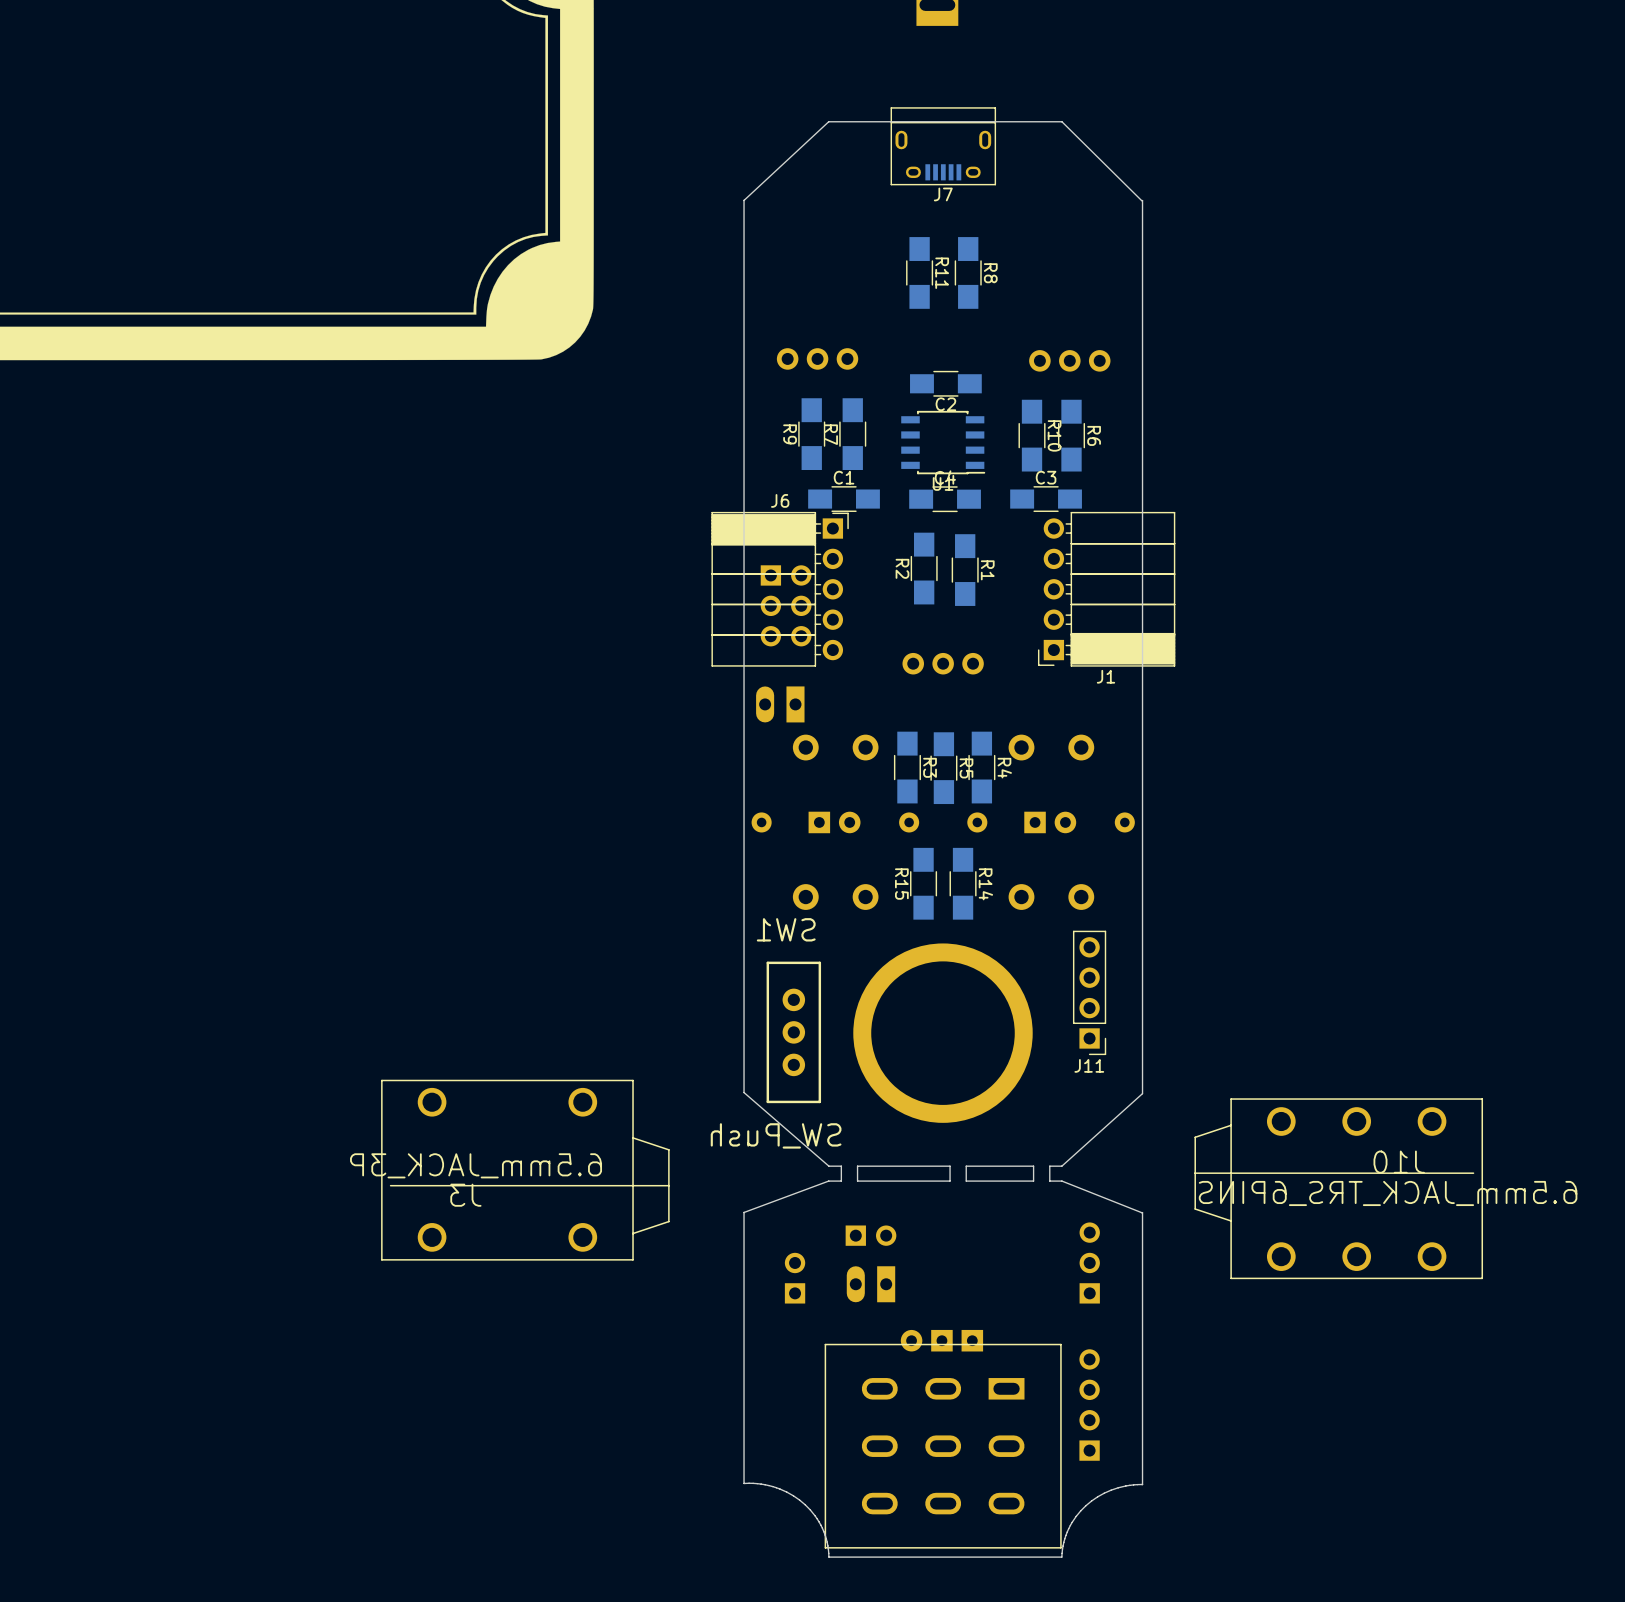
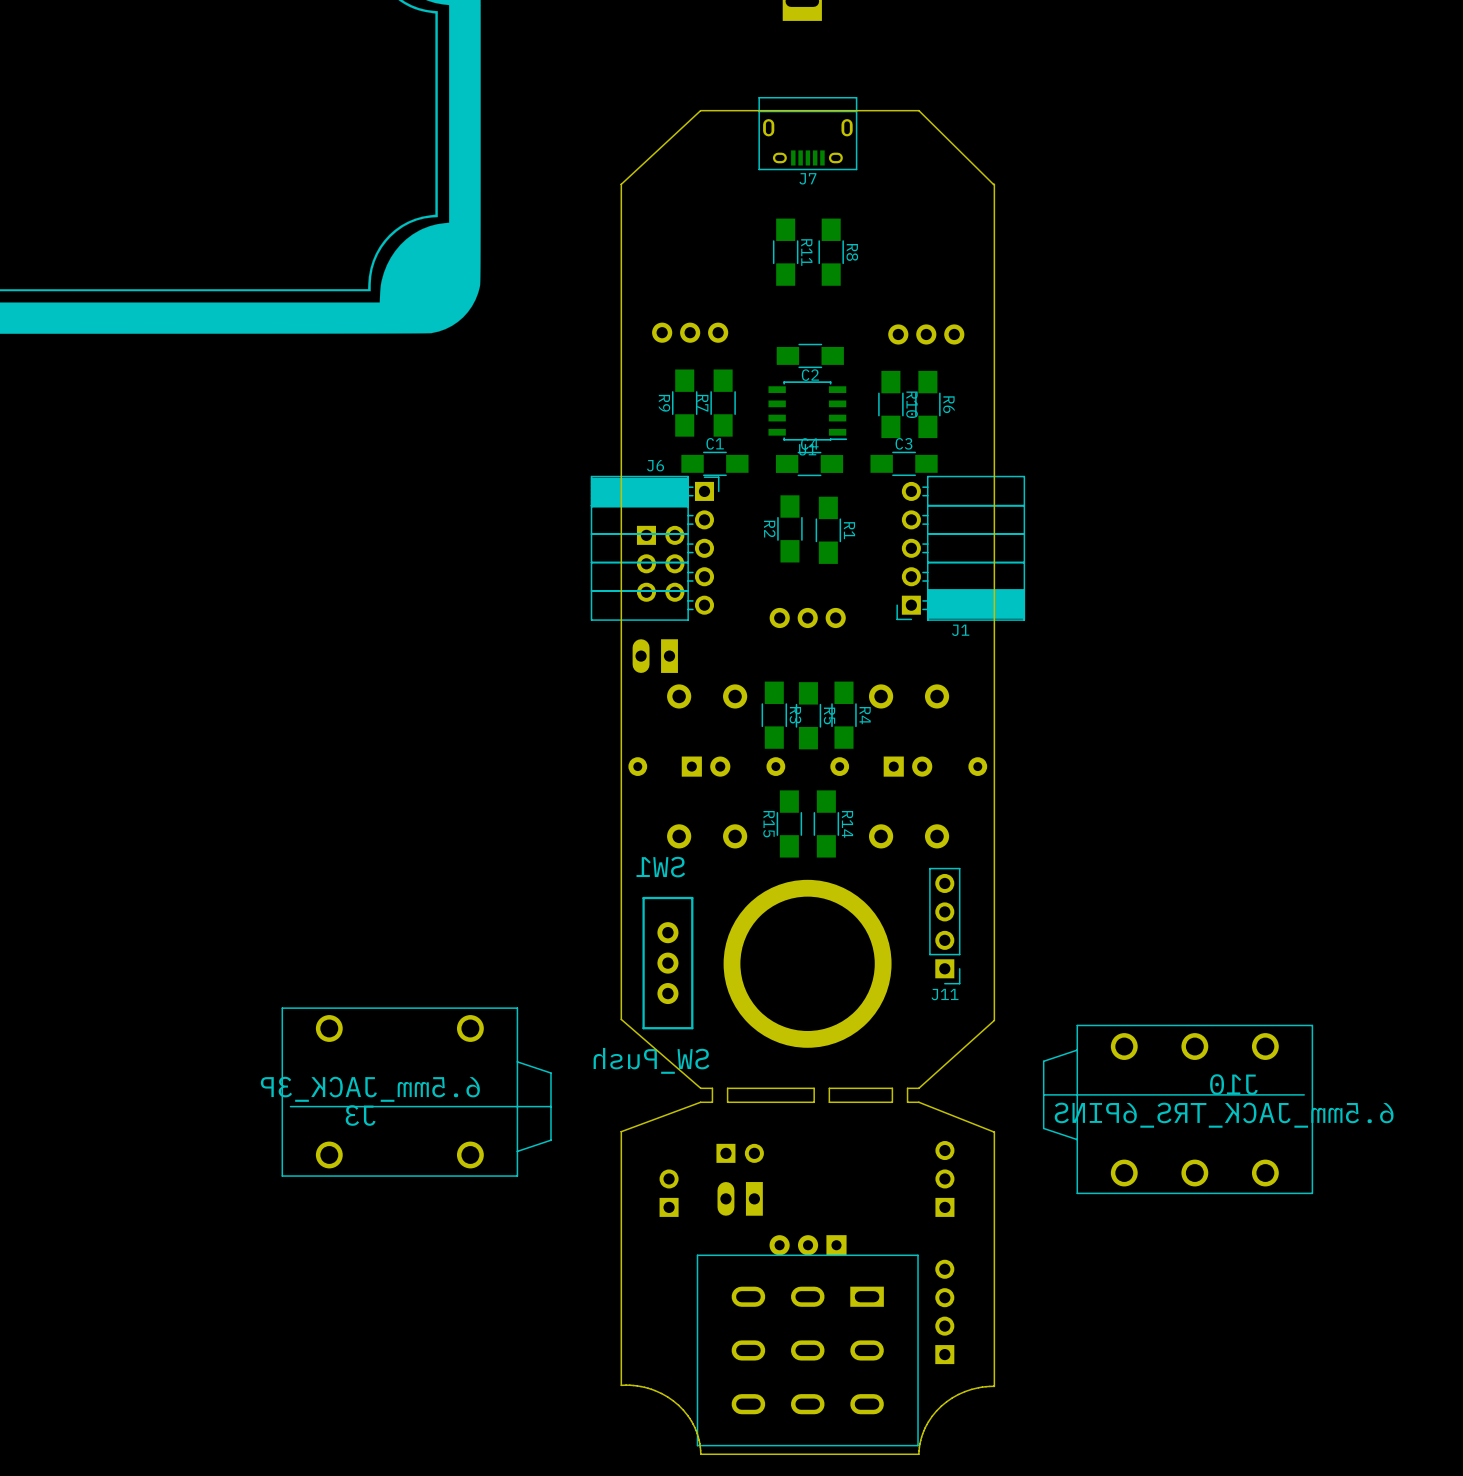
part footprint: [900, 1329, 984, 1352] -> [769, 1235, 847, 1256]

